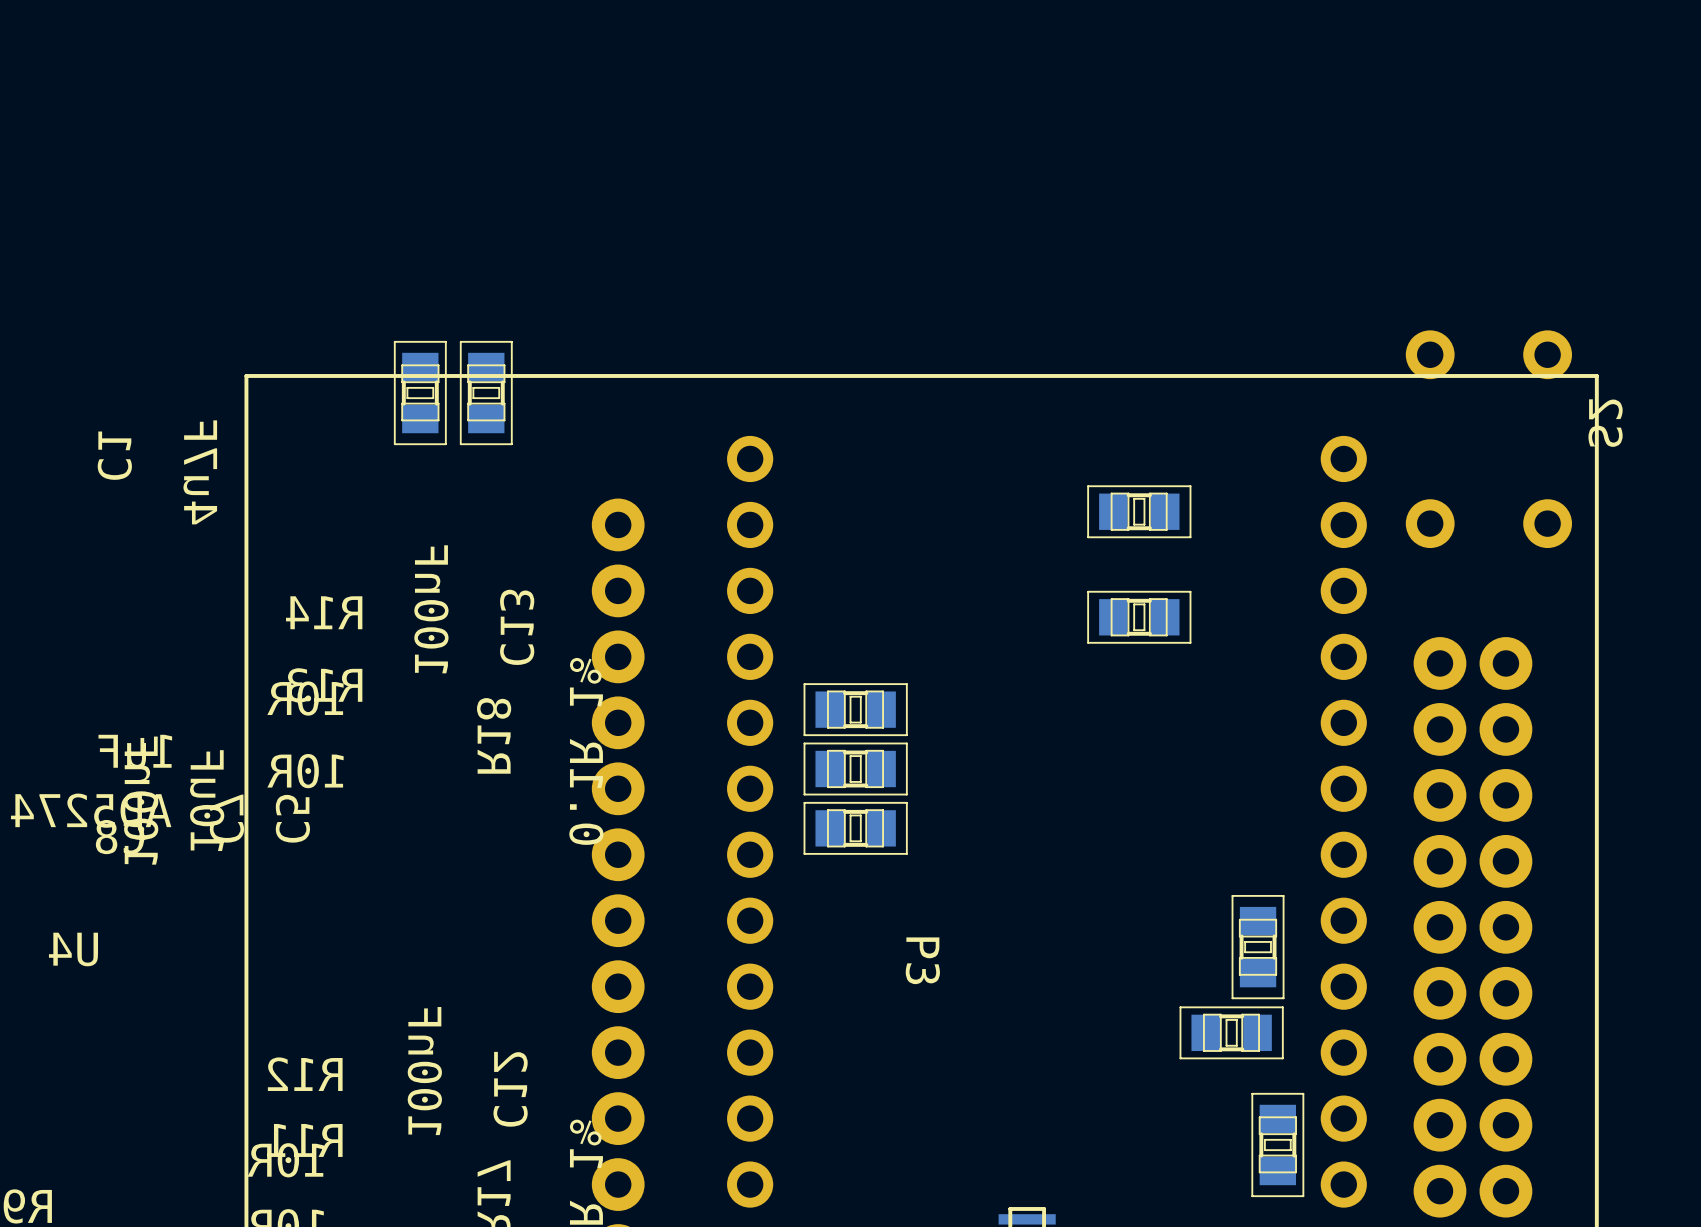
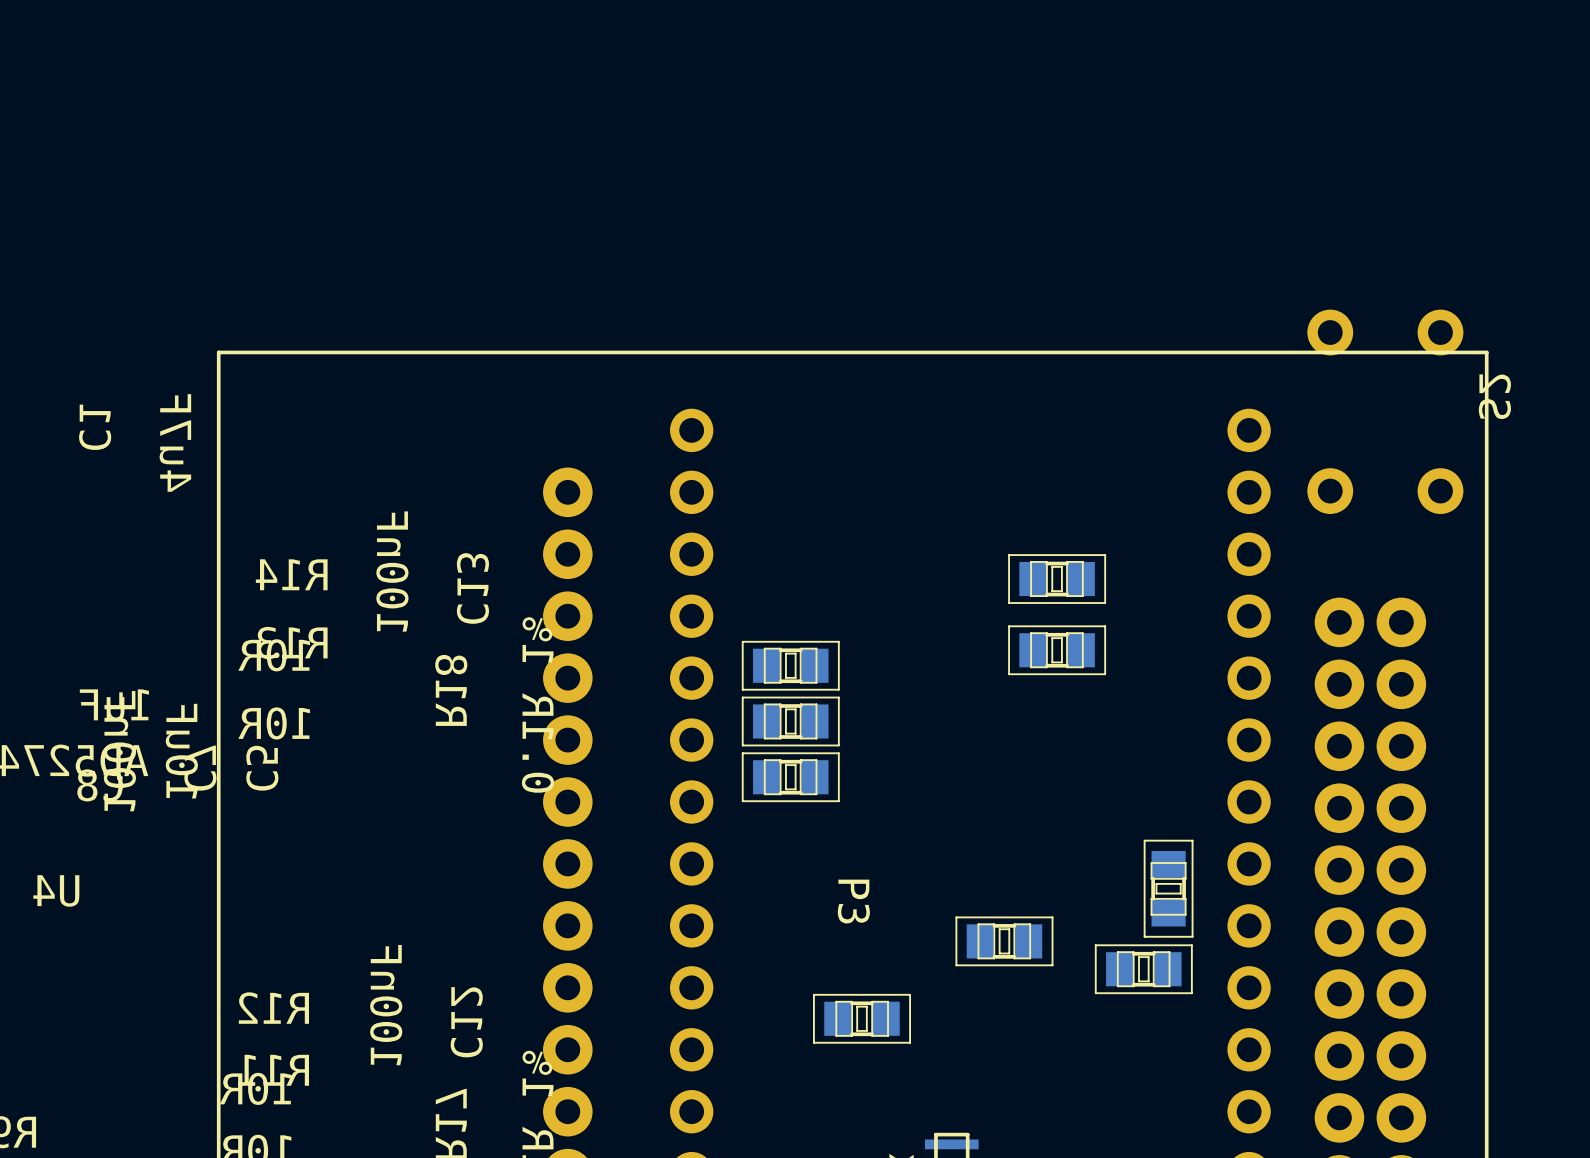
part: (420, 393) -> none
part: (486, 393) -> none
part position: (1139, 511) -> (1057, 650)
part: none -> (1004, 941)
part: none -> (862, 1018)
part: (1277, 1144) -> none

